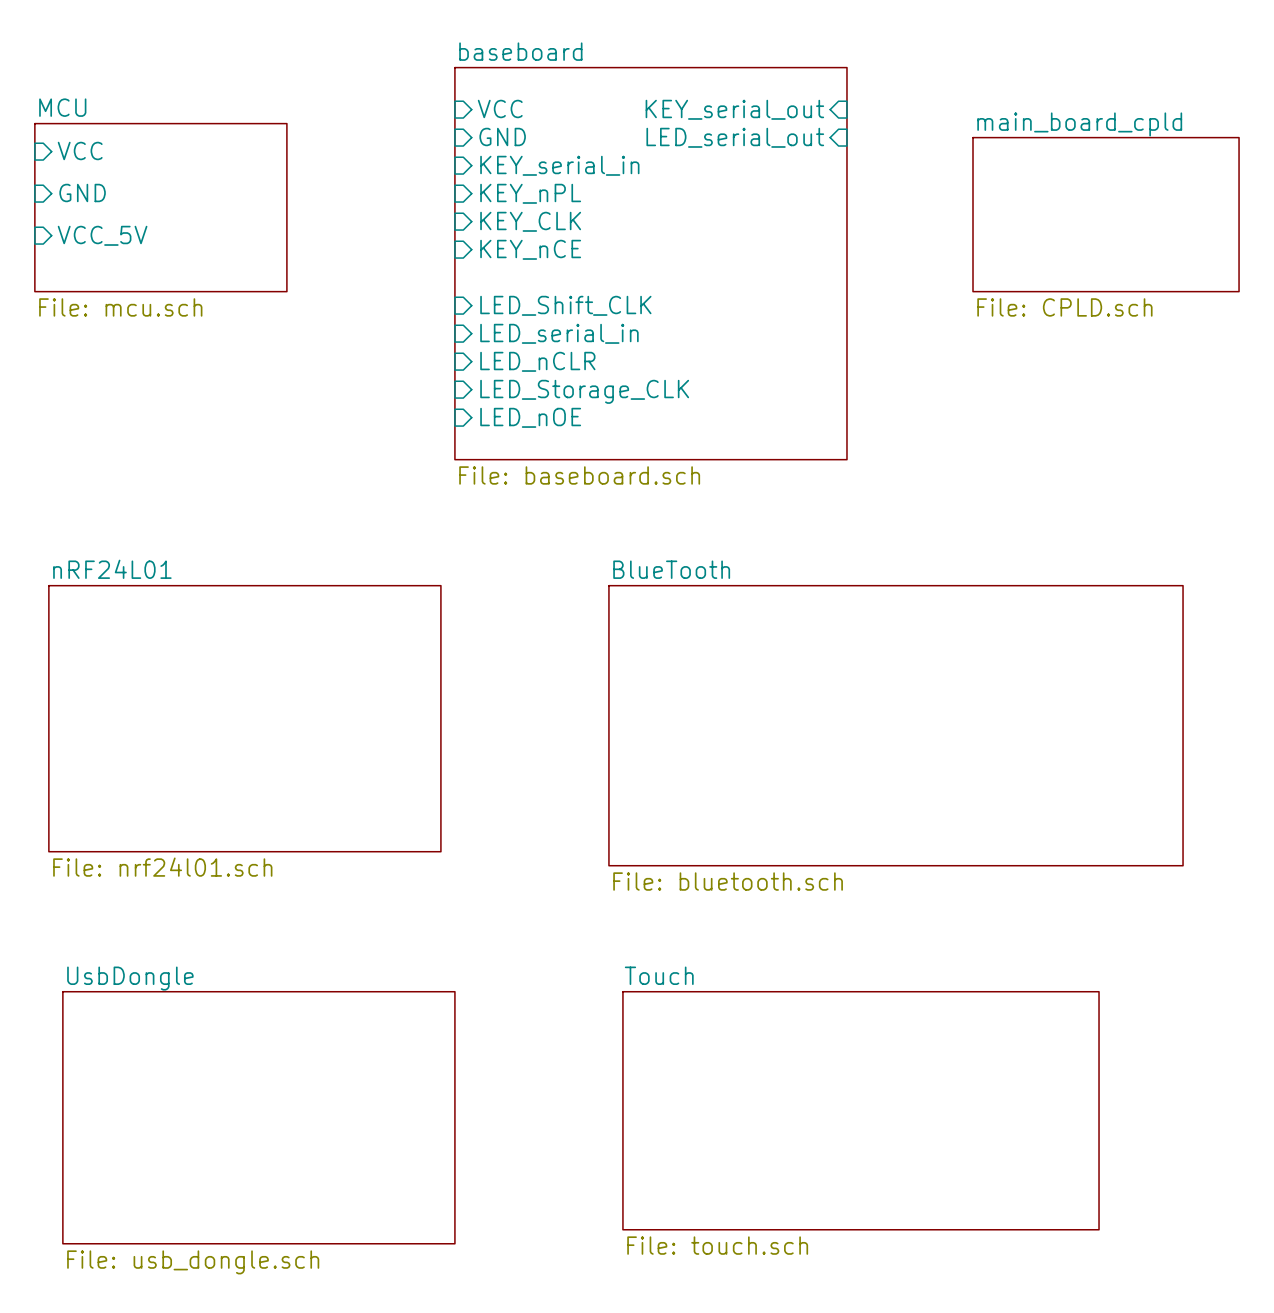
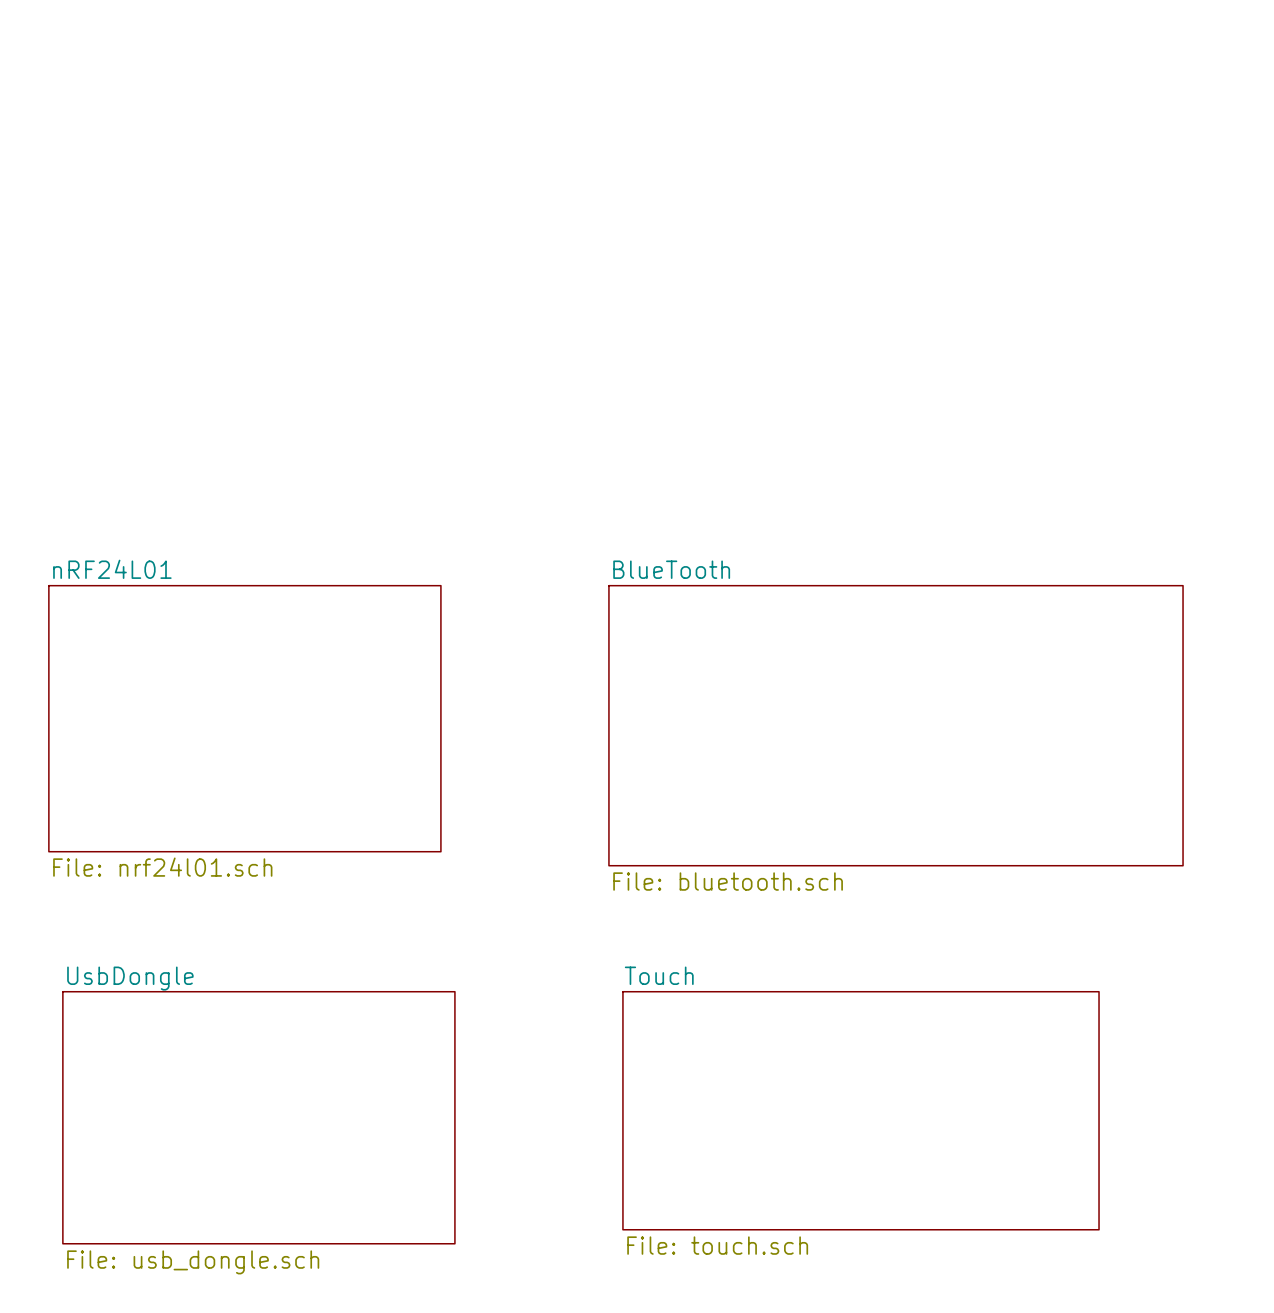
sheet pin: VCC (500, 108) -> none
sheet pin: KEY_serial_out (734, 109) -> none
sheet pin: GND (502, 136) -> none
sheet pin: LED_serial_out (735, 137) -> none
sheet pin: VCC (80, 150) -> none
sheet pin: KEY_serial_in (559, 165) -> none
sheet pin: GND (82, 192) -> none
sheet pin: KEY_nPL (530, 193) -> none
sheet MCU: File: mcu.sch (160, 207) -> none
sheet main_board_cpld: File: CPLD.sch (1106, 214) -> none
sheet pin: KEY_CLK (530, 221) -> none
sheet pin: VCC_5V (102, 235) -> none
sheet pin: KEY_nCE (530, 249) -> none
sheet baseboard: File: baseboard.sch (650, 263) -> none
sheet pin: LED_Shift_CLK (565, 305) -> none
sheet pin: LED_serial_in (559, 333) -> none
sheet pin: LED_nCLR (537, 361) -> none
sheet pin: LED_Storage_CLK (584, 391) -> none
sheet pin: LED_nOE (530, 417) -> none

